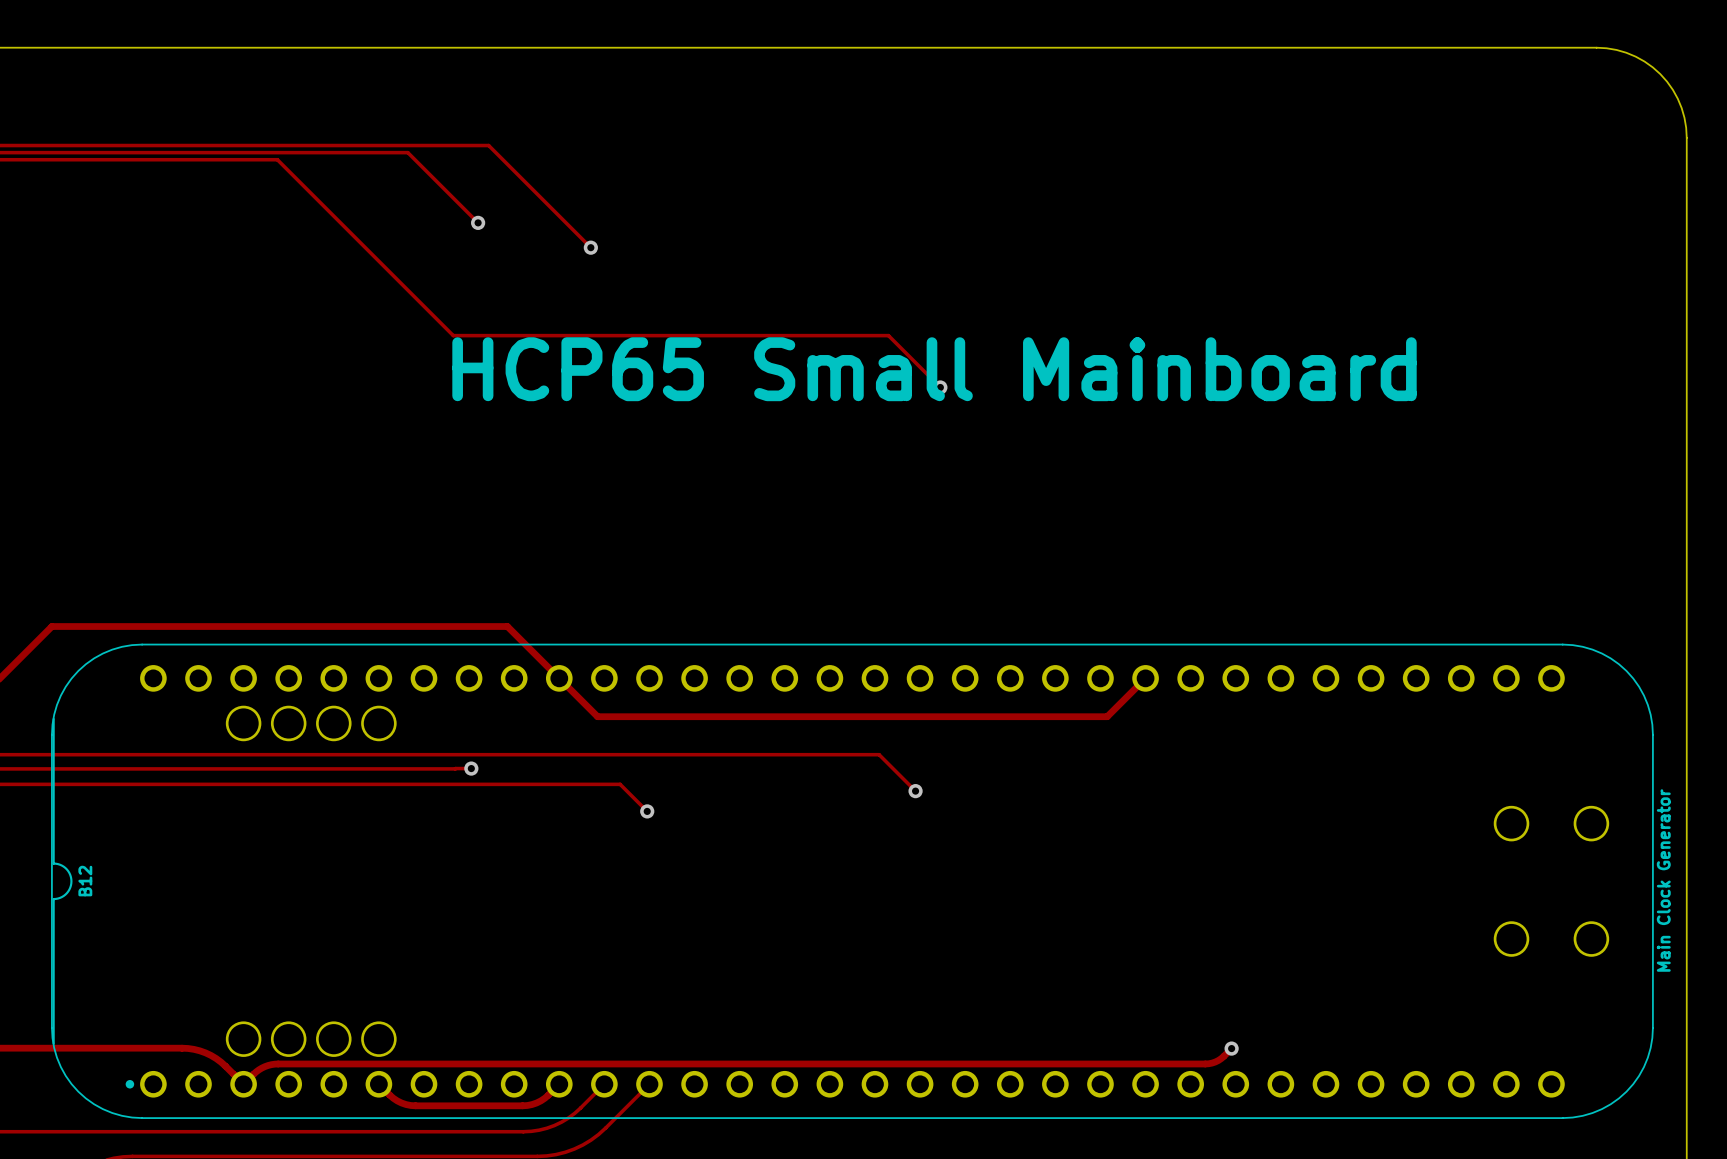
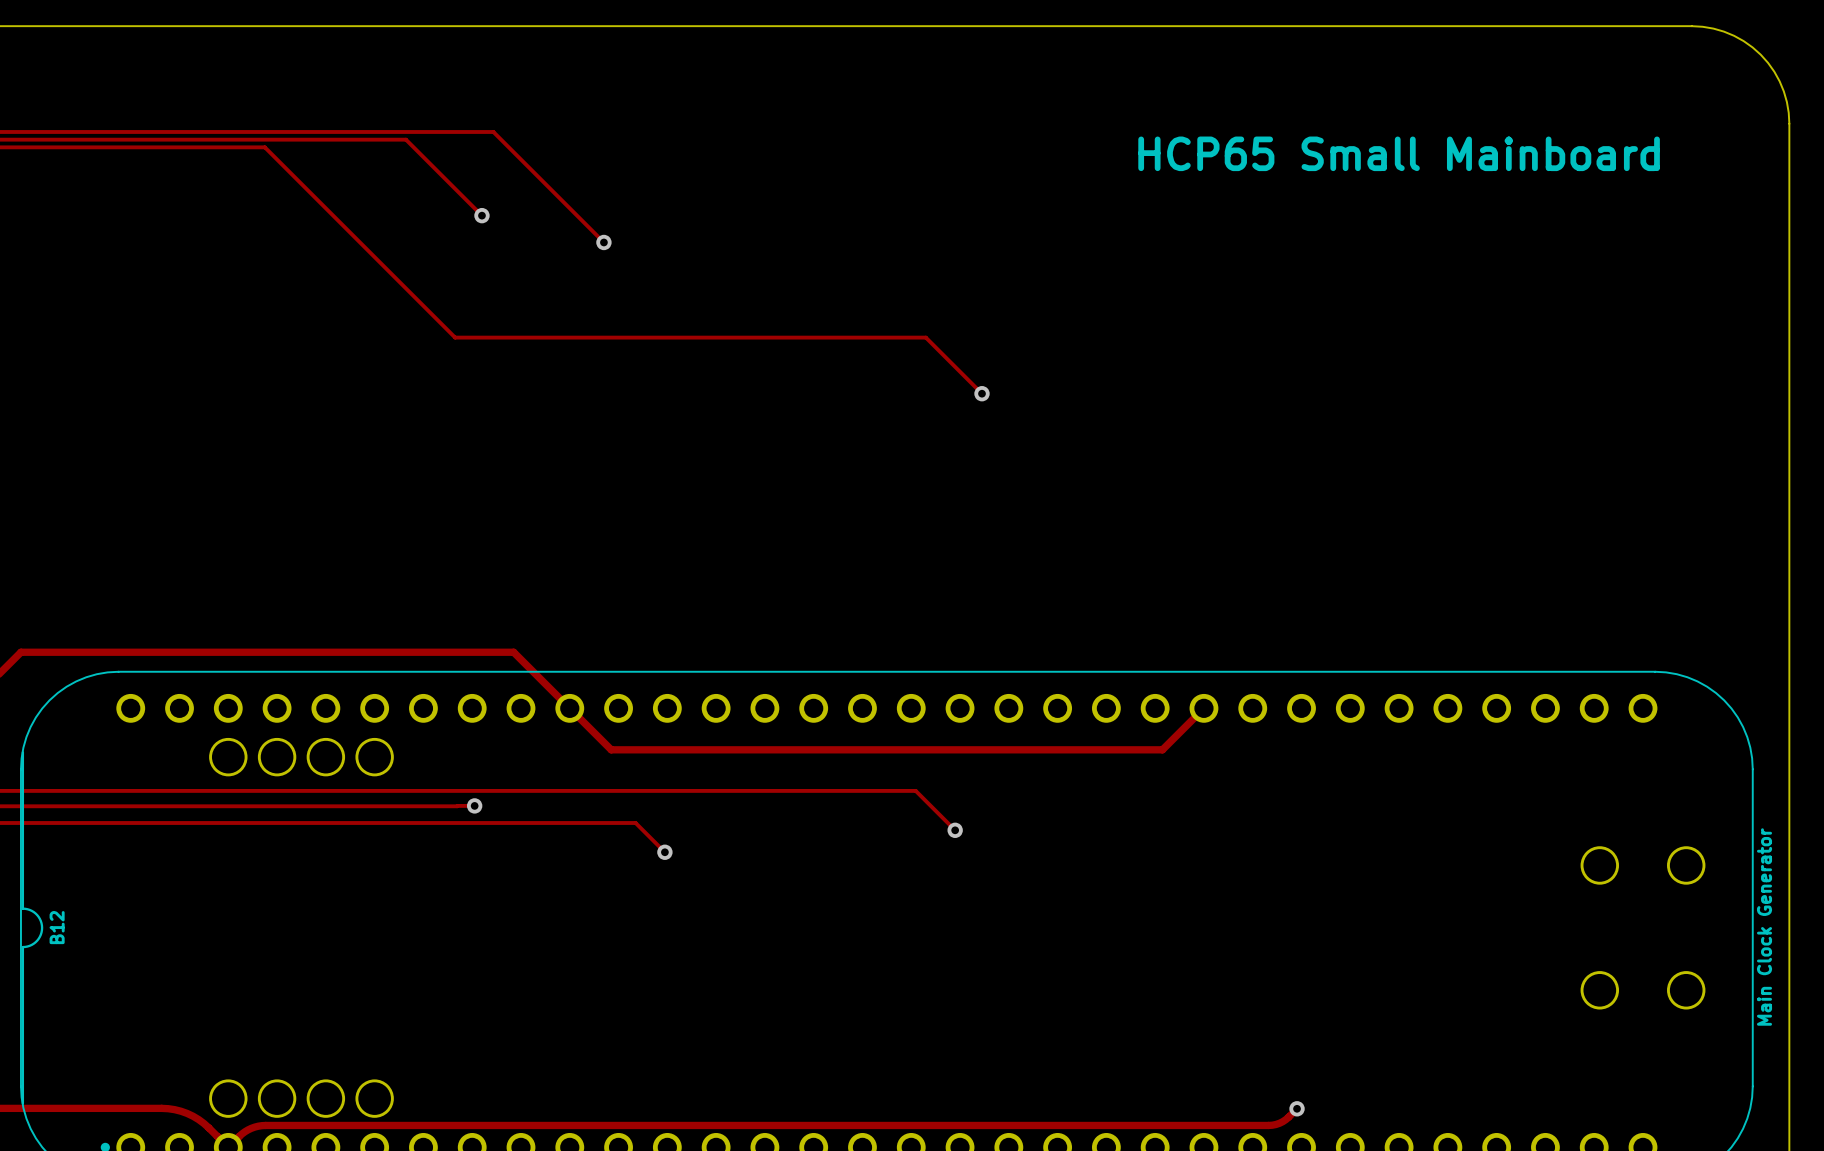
text: none -> HCP65 Small Mainboard (1399, 153)
text: HCP65 Small Mainboard (934, 369) -> none

